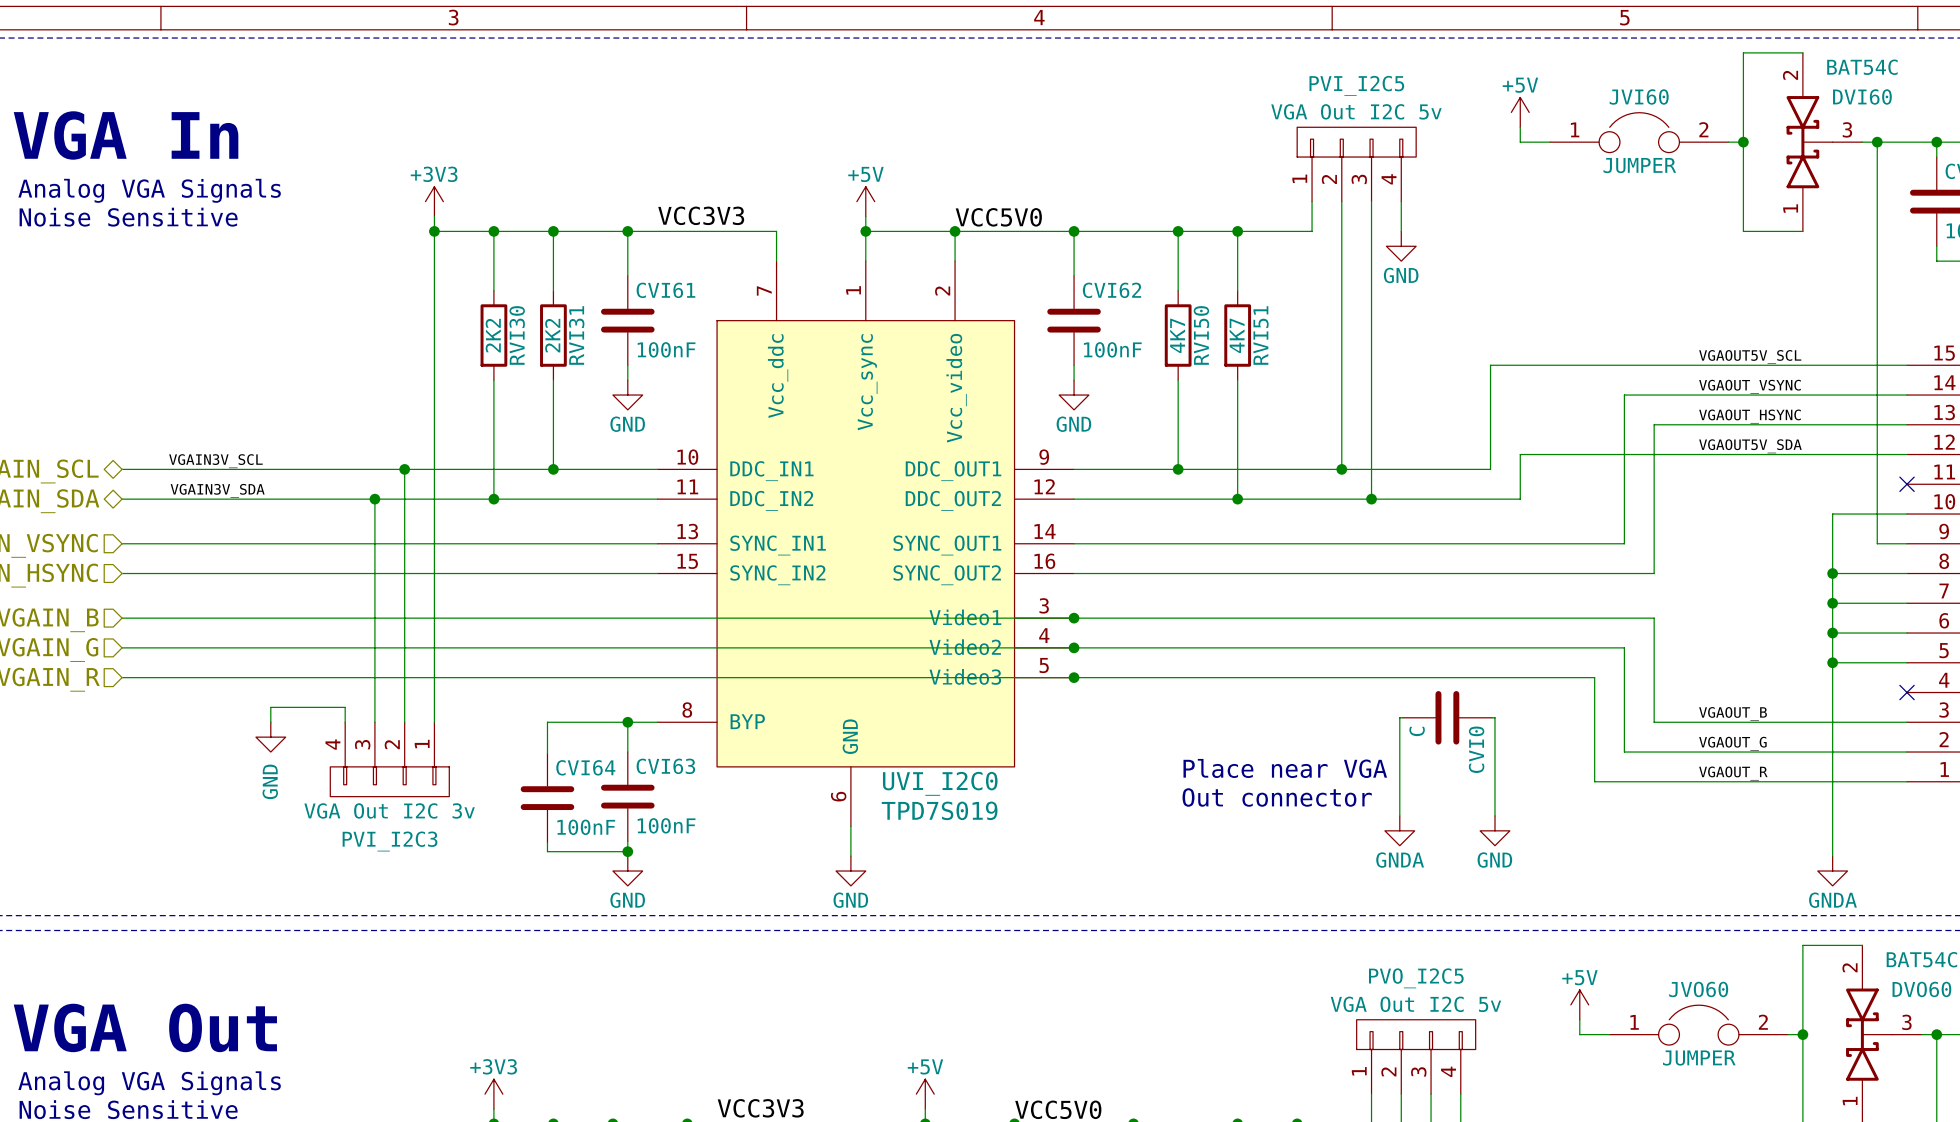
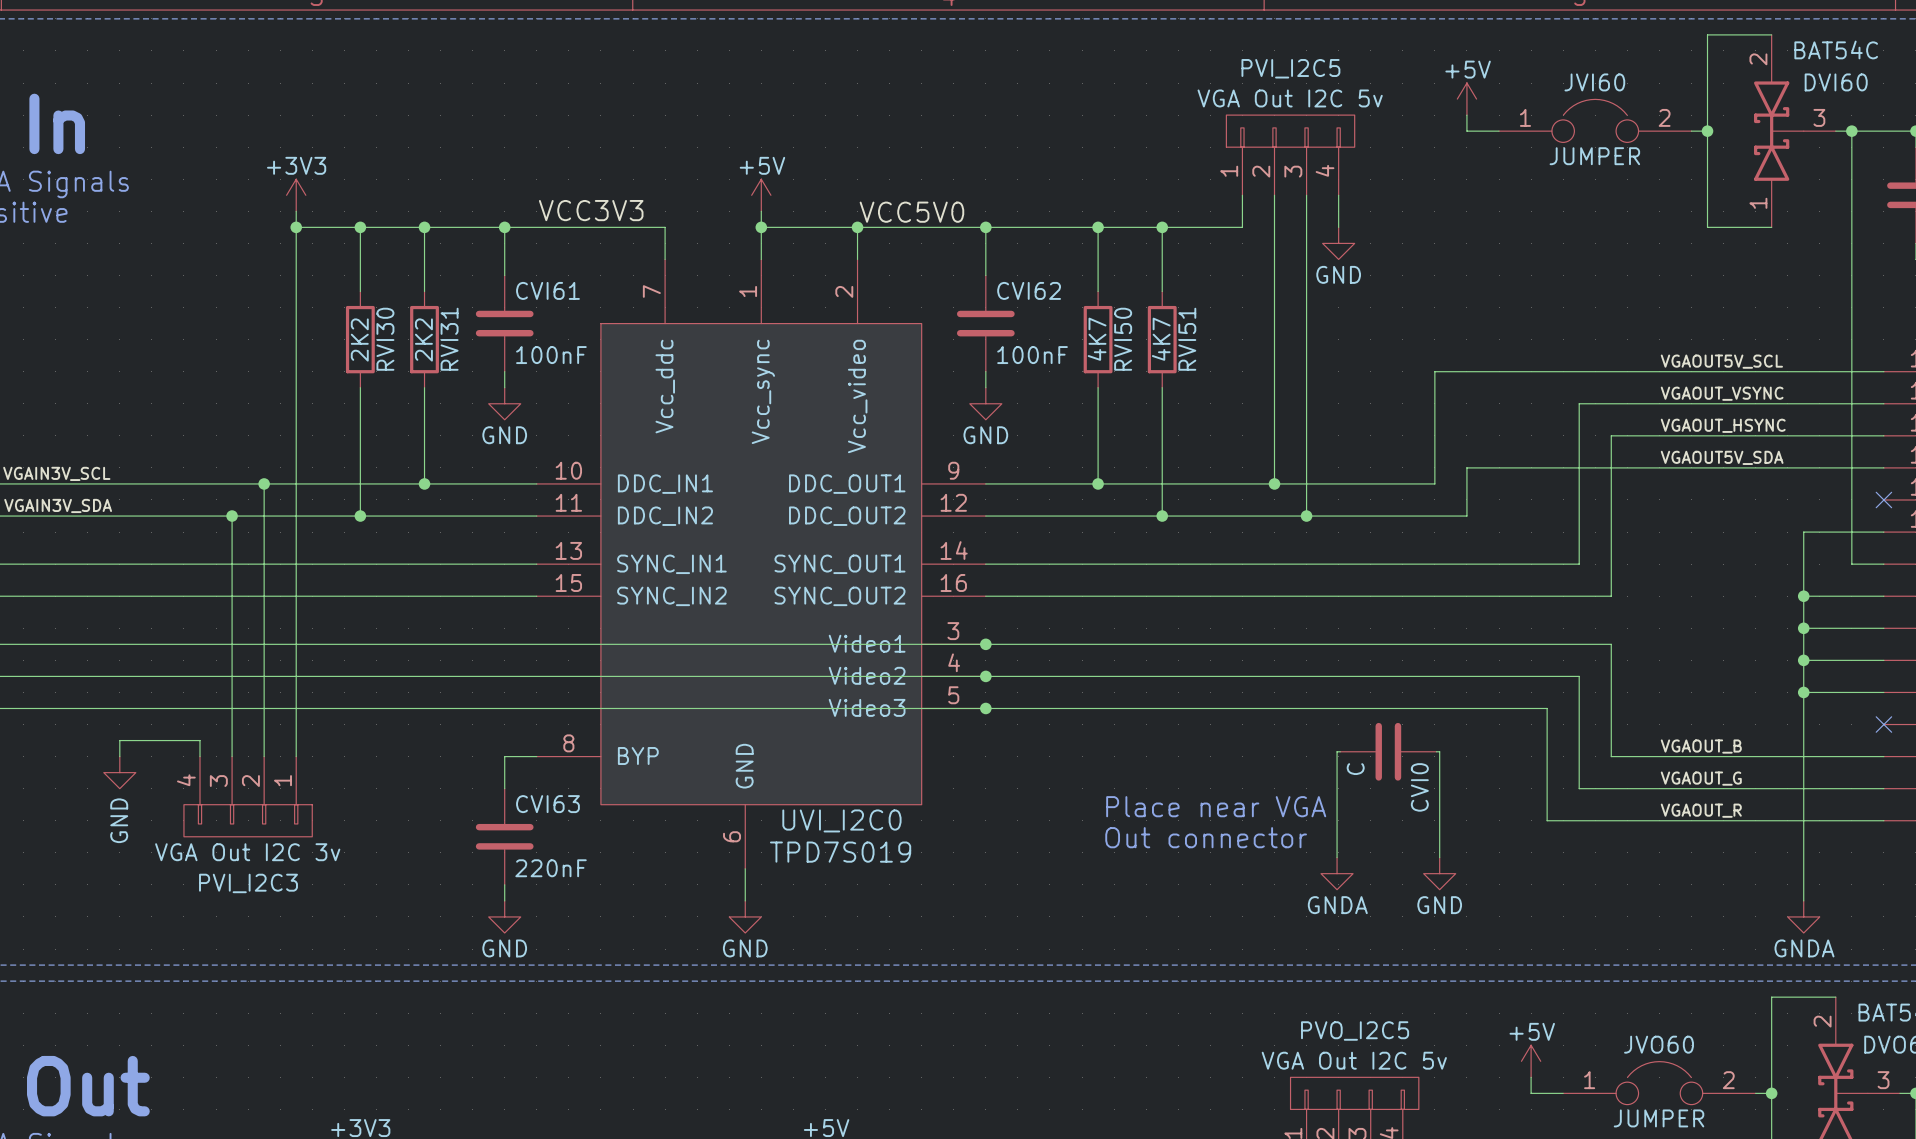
wire: (627, 722) (547, 722) (547, 753) -> none
junction: (627, 722) -> none
CVI64: 100nF (547, 798) -> none
CVI63 value: 100nF (666, 825) -> 220nF (551, 868)
wire: (547, 842) (547, 851) (627, 851) -> none
junction: (627, 851) -> none

